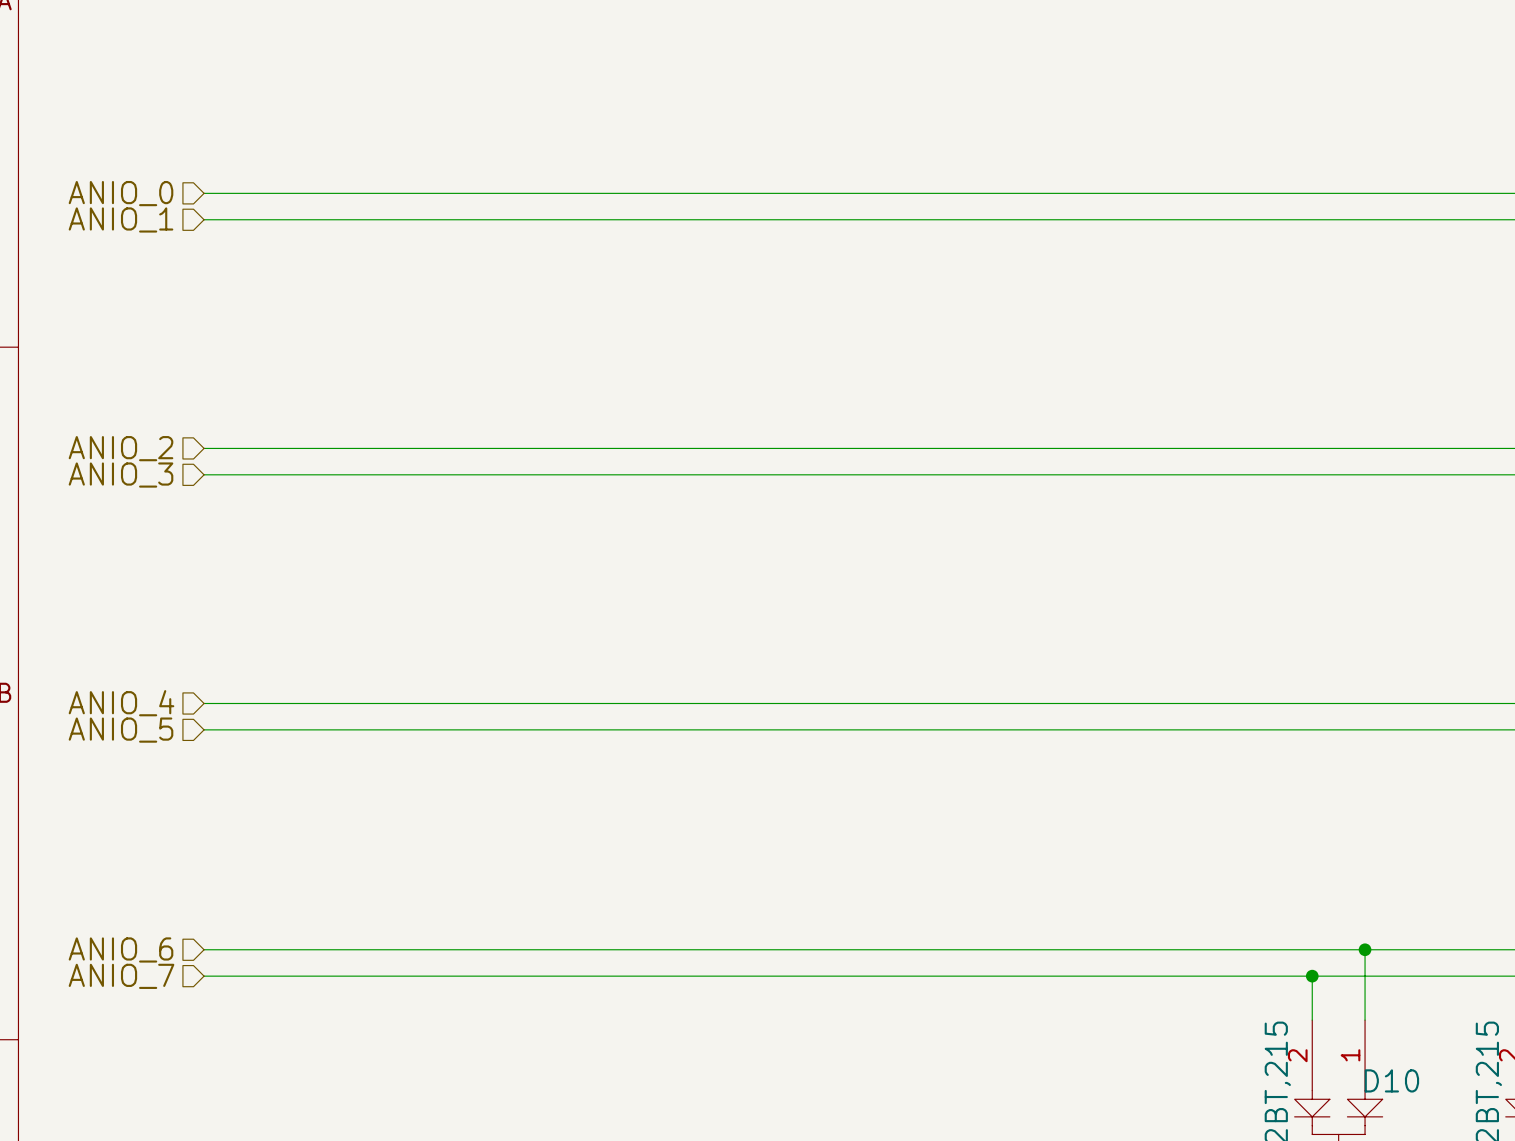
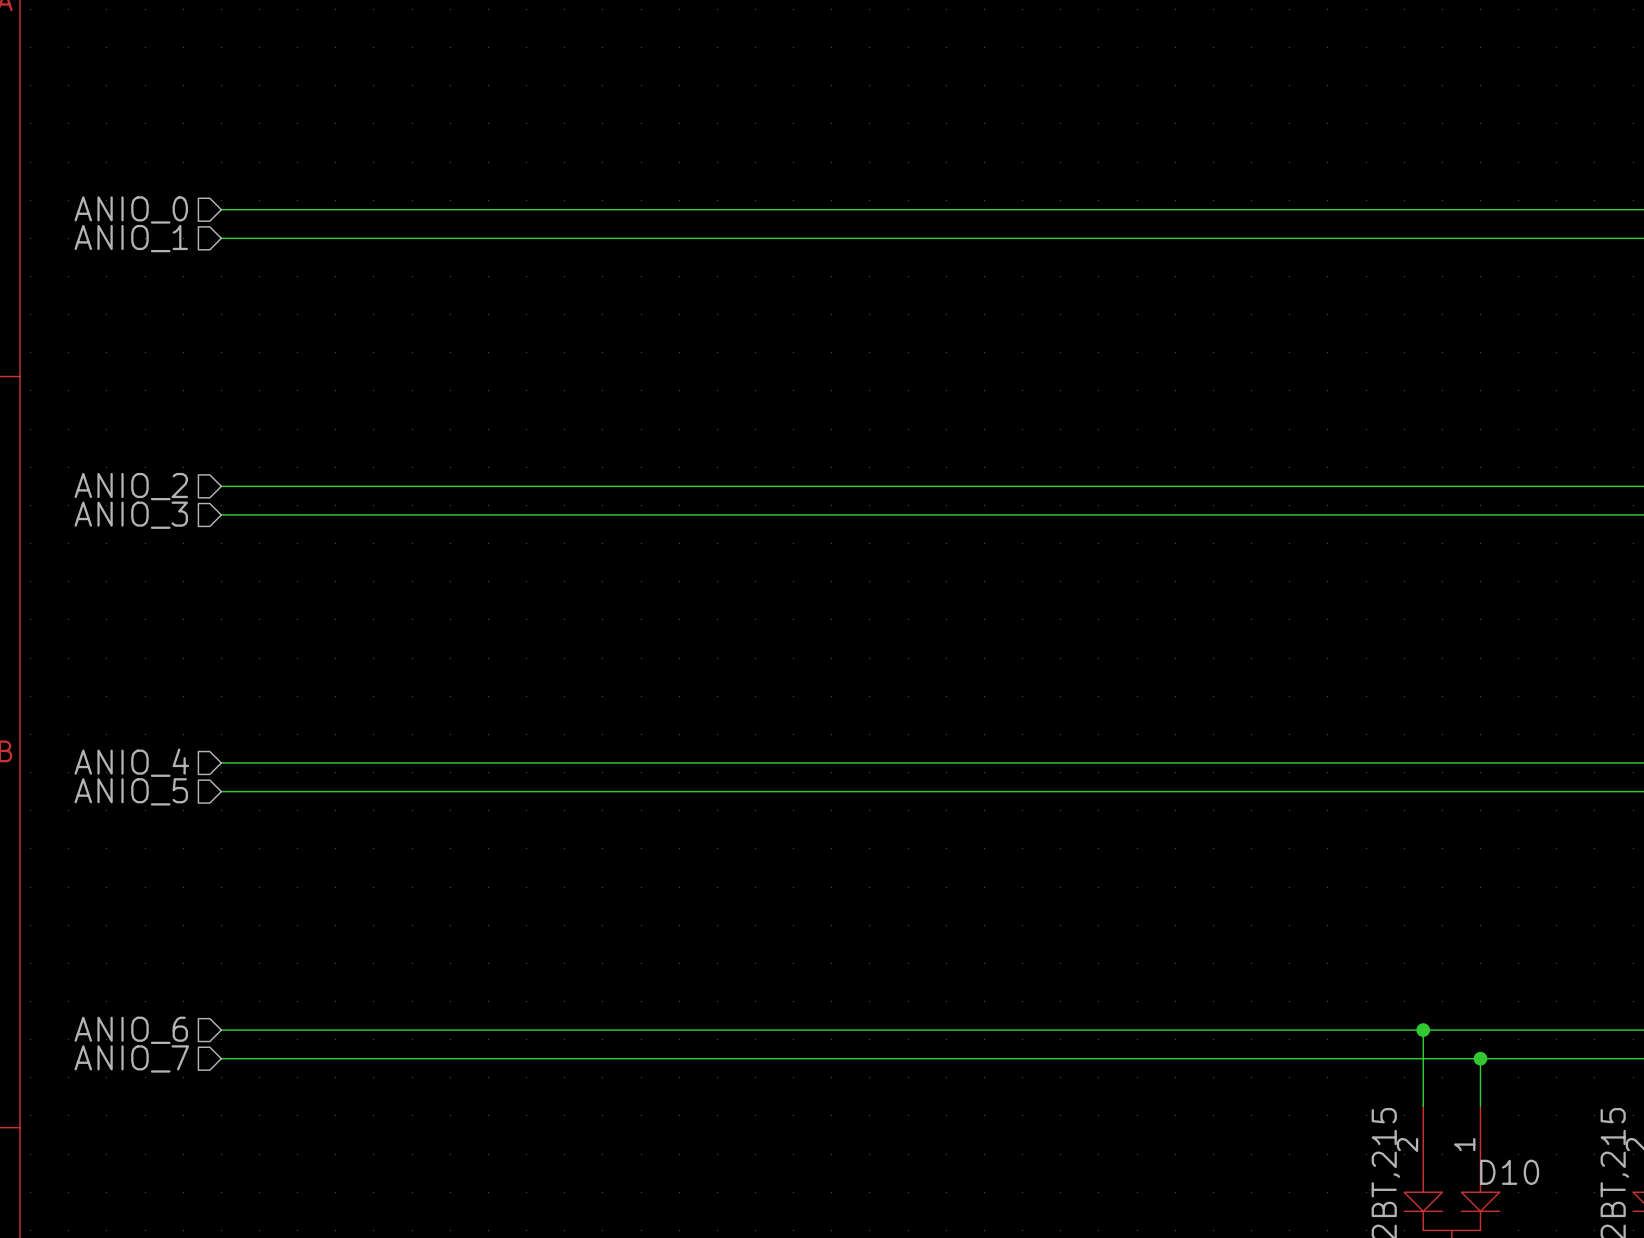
junction: none -> (1423, 1030)
wire: (1365, 949) (1365, 976) -> (1423, 1030) (1423, 1058)
junction: (1365, 949) -> none
junction: (1312, 976) -> none
junction: none -> (1480, 1058)

